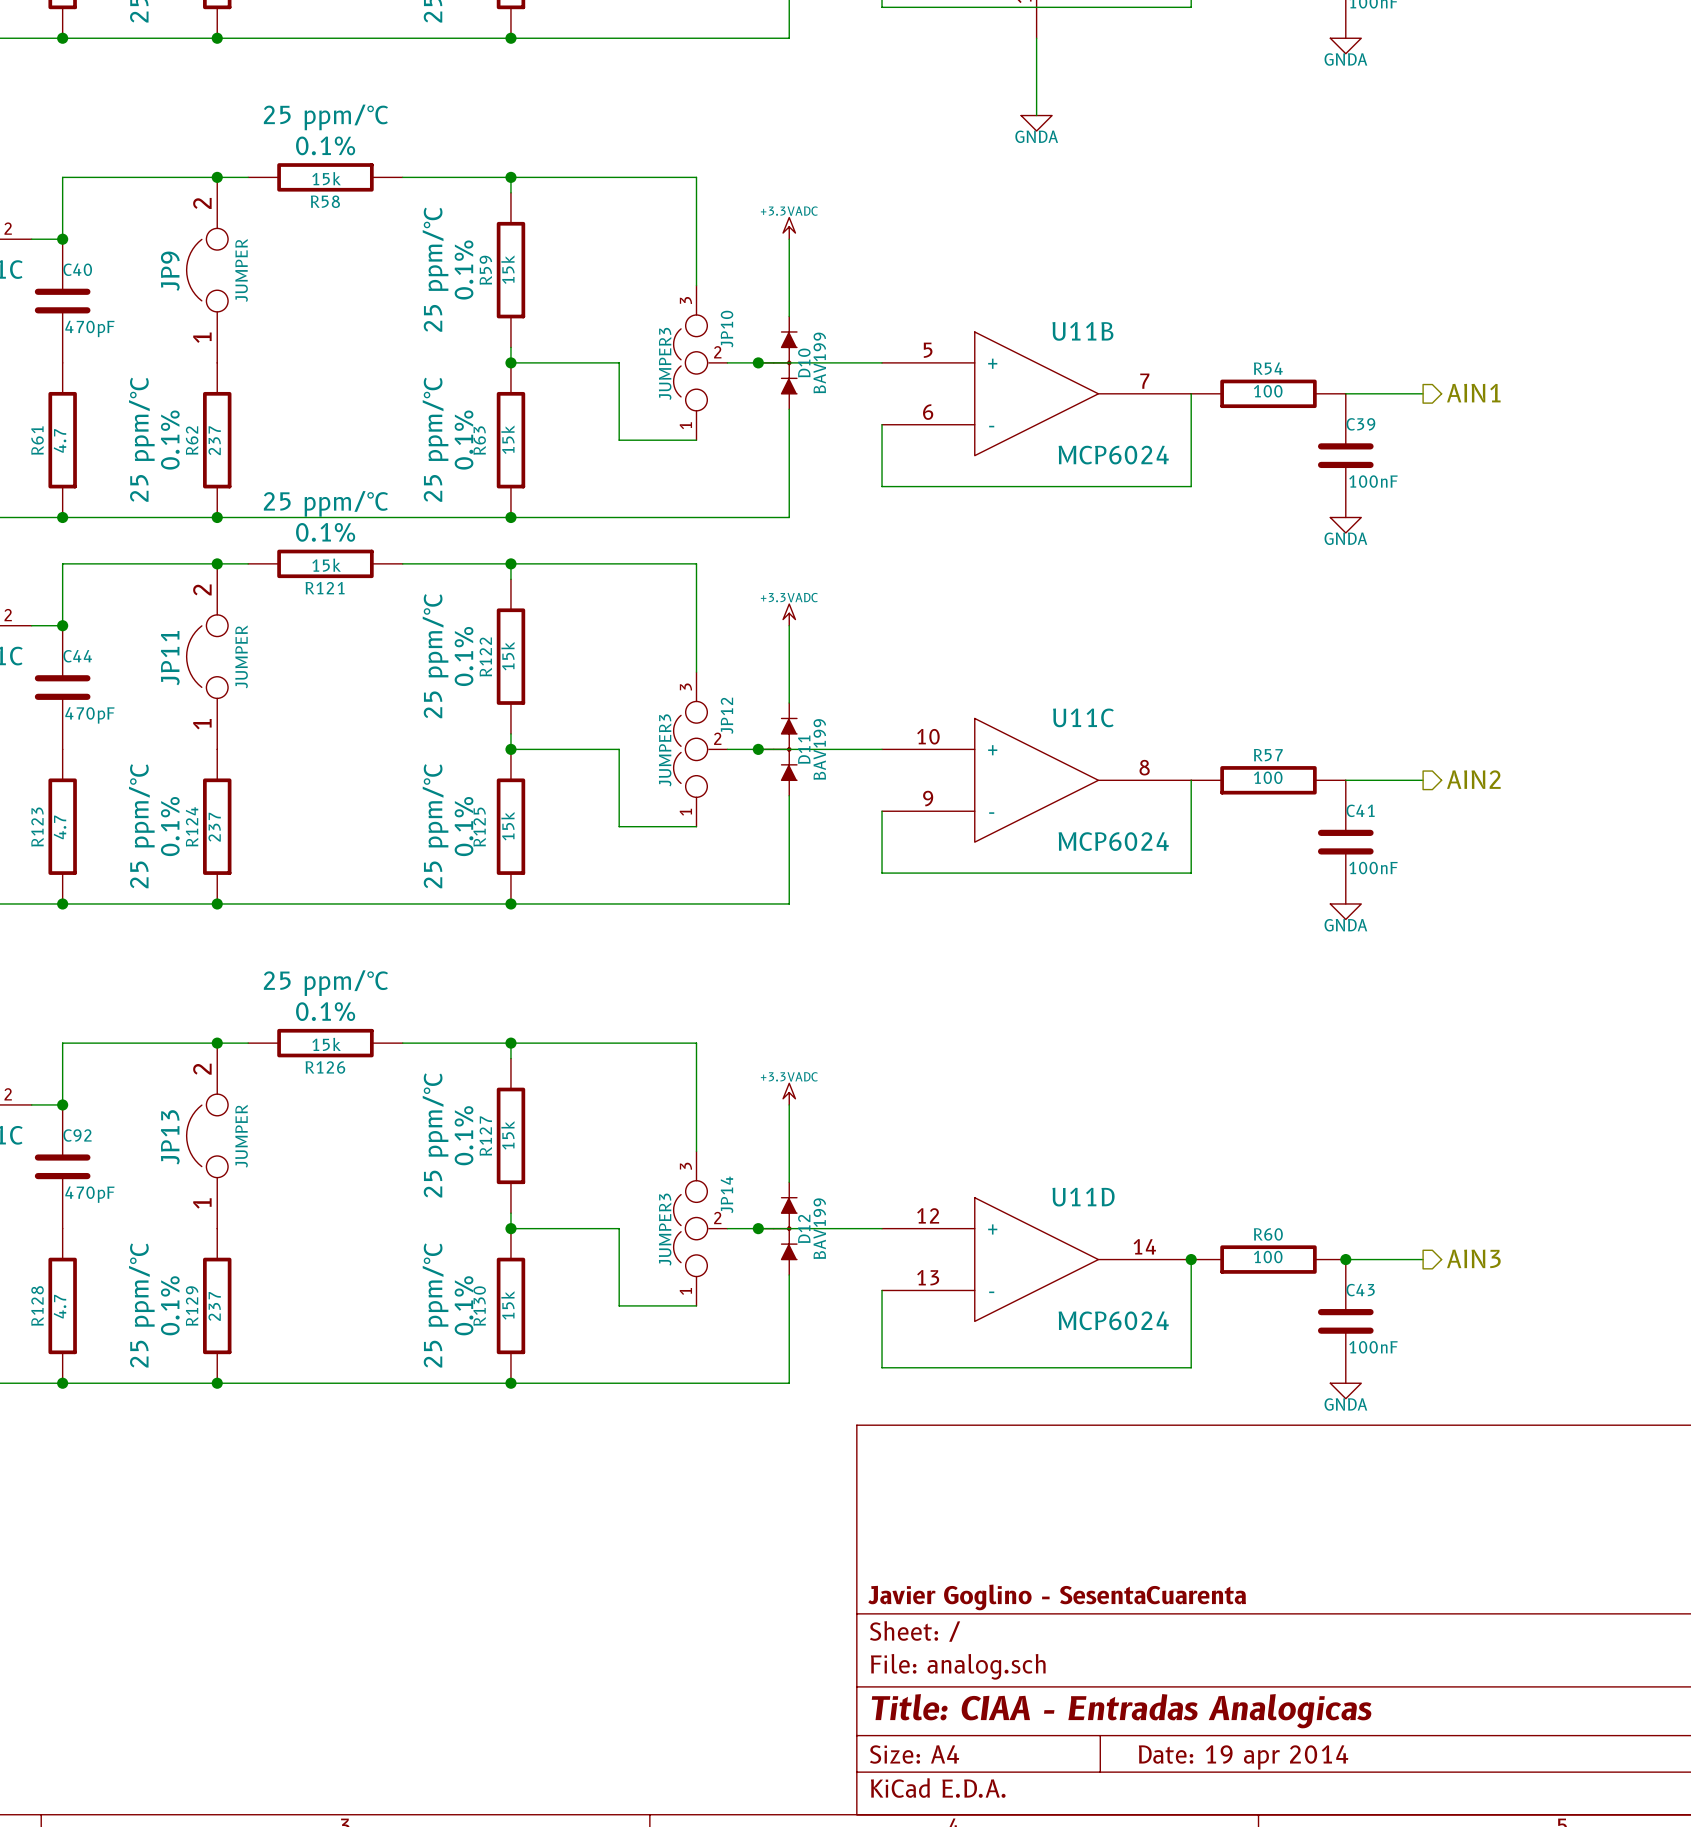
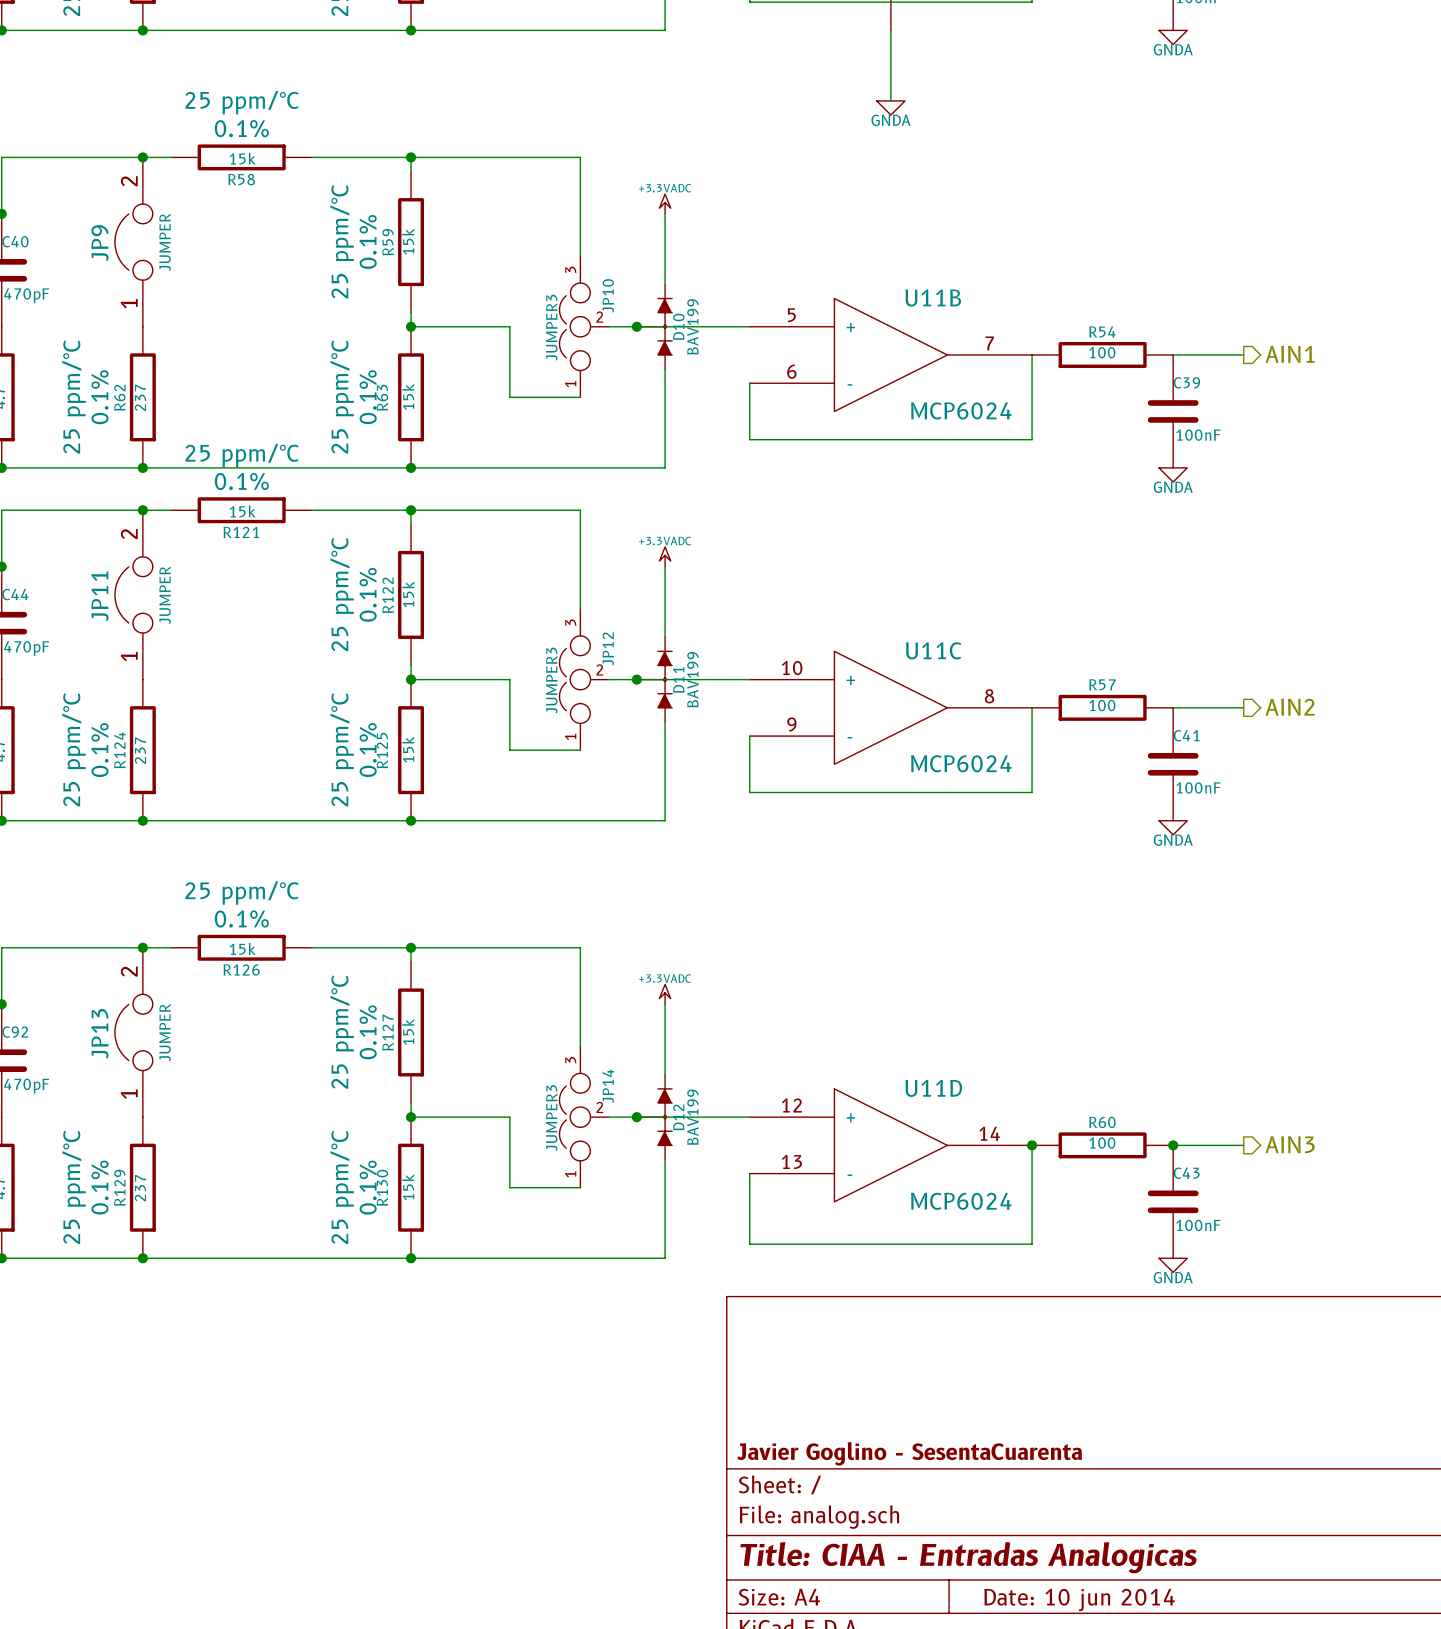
title block: Date: 19 apr 2014 (1243, 1757) -> Date: 10 jun 2014 (1079, 1599)

